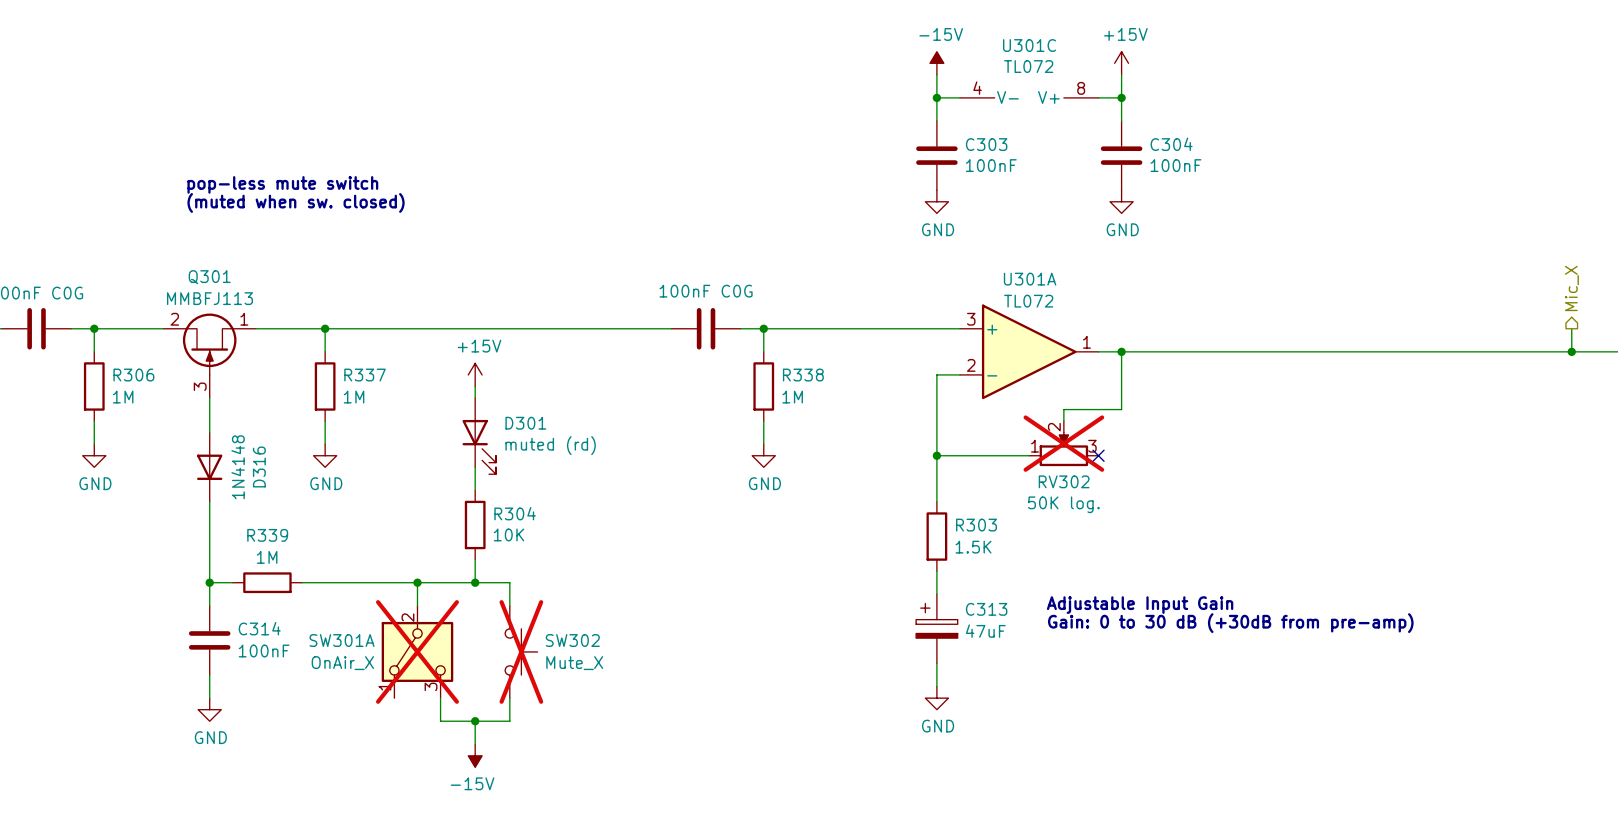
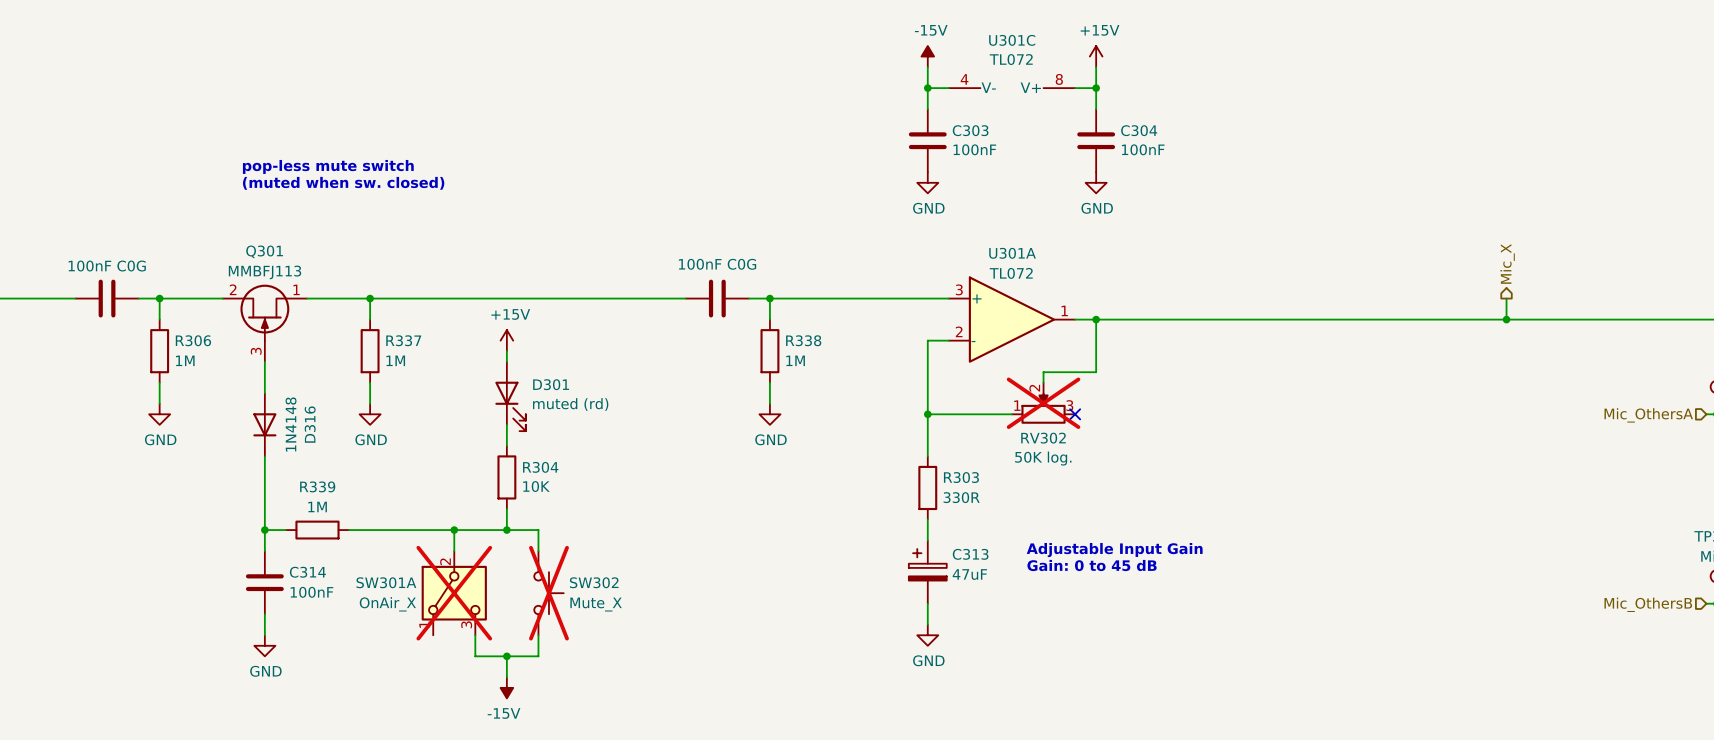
R303 value: 1.5K (973, 547) -> 330R (961, 497)
text: Gain: 0 to 30 dB (+30dB from pre-amp) (1230, 623) -> Gain: 0 to 45 dB (1092, 565)

